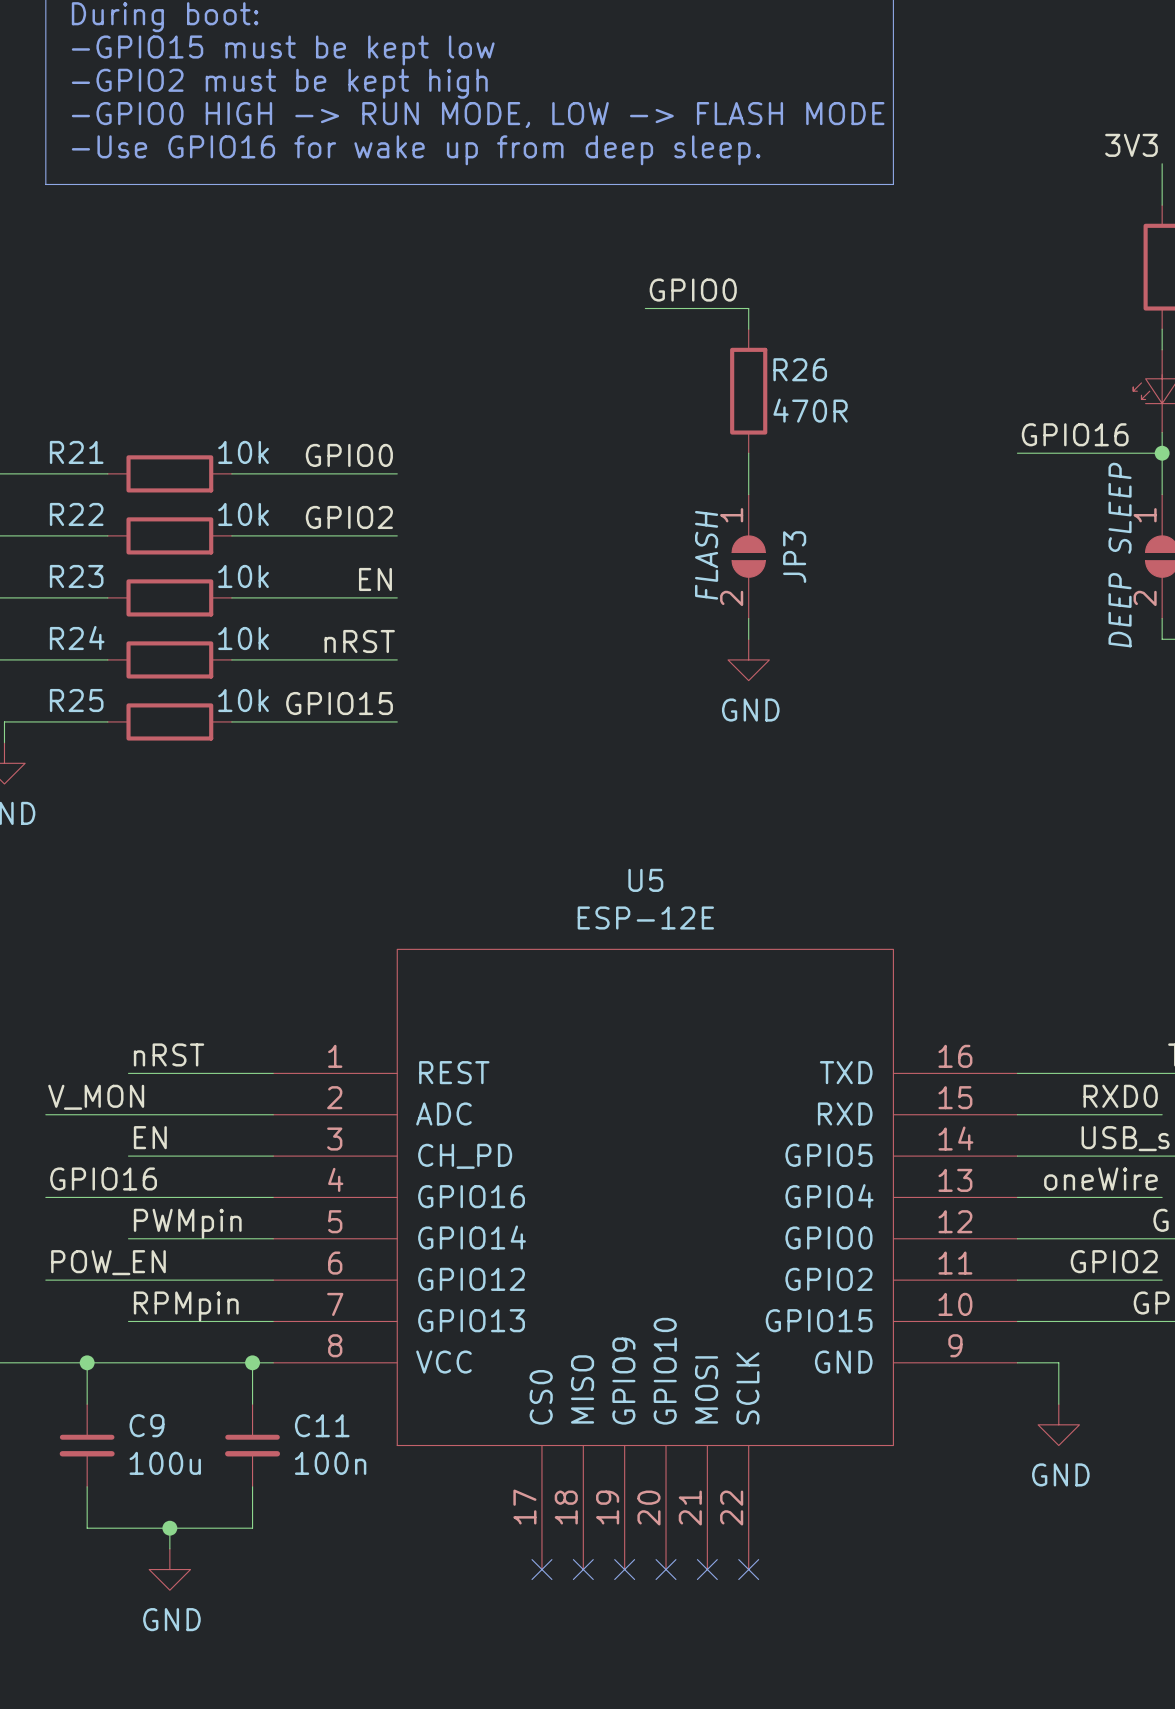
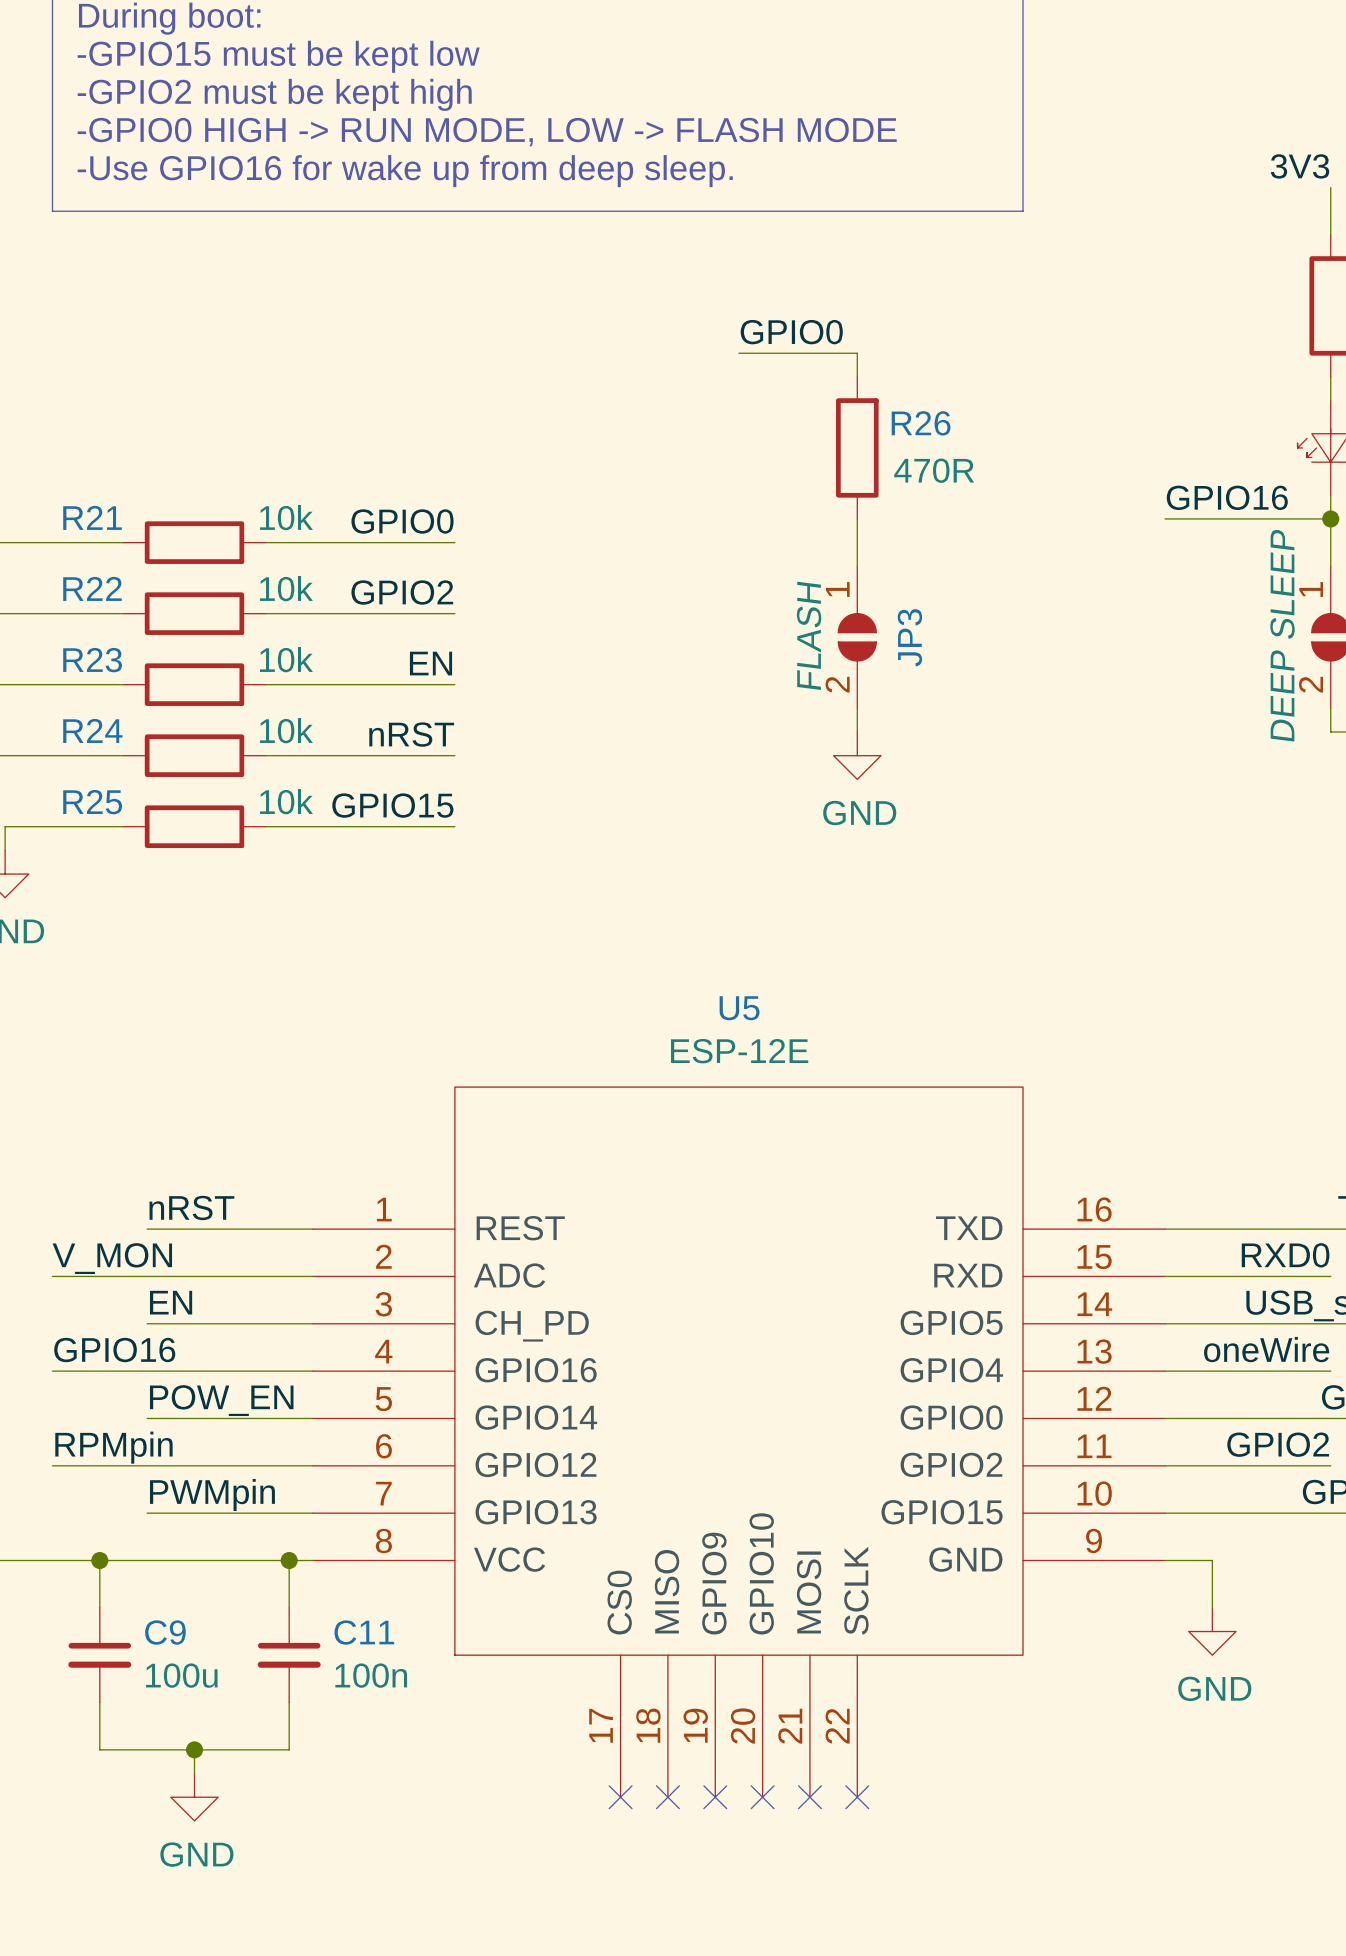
label: PWMpin (187, 1223) -> POW_EN (221, 1400)
label: POW_EN (108, 1262) -> RPMpin (113, 1447)
label: RPMpin (186, 1306) -> PWMpin (212, 1494)

